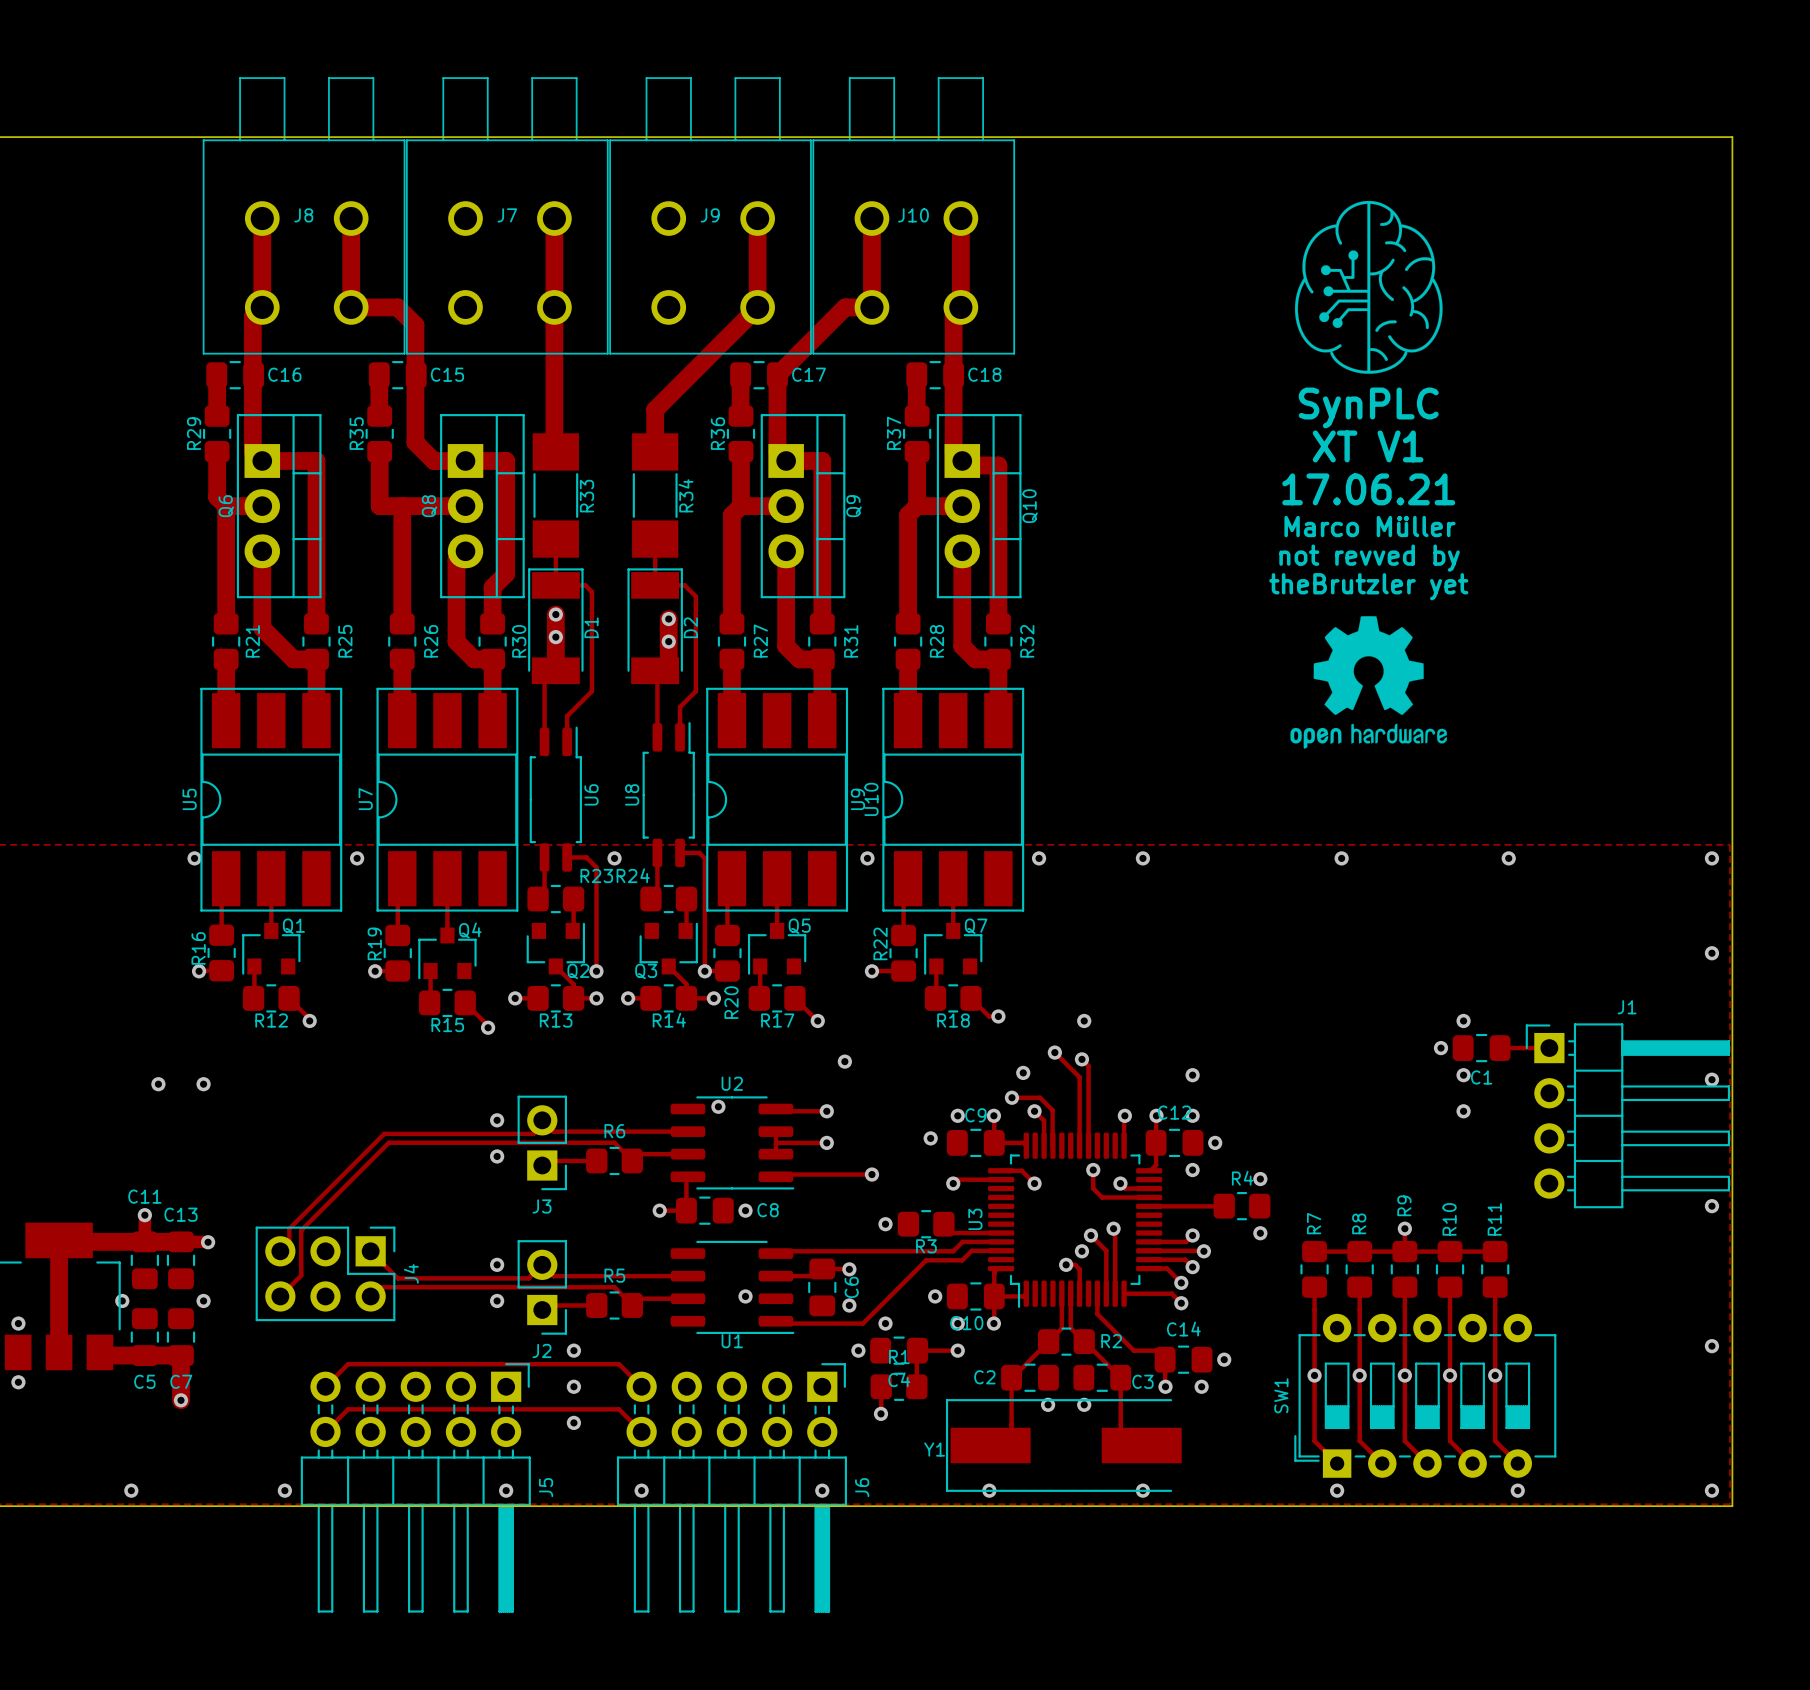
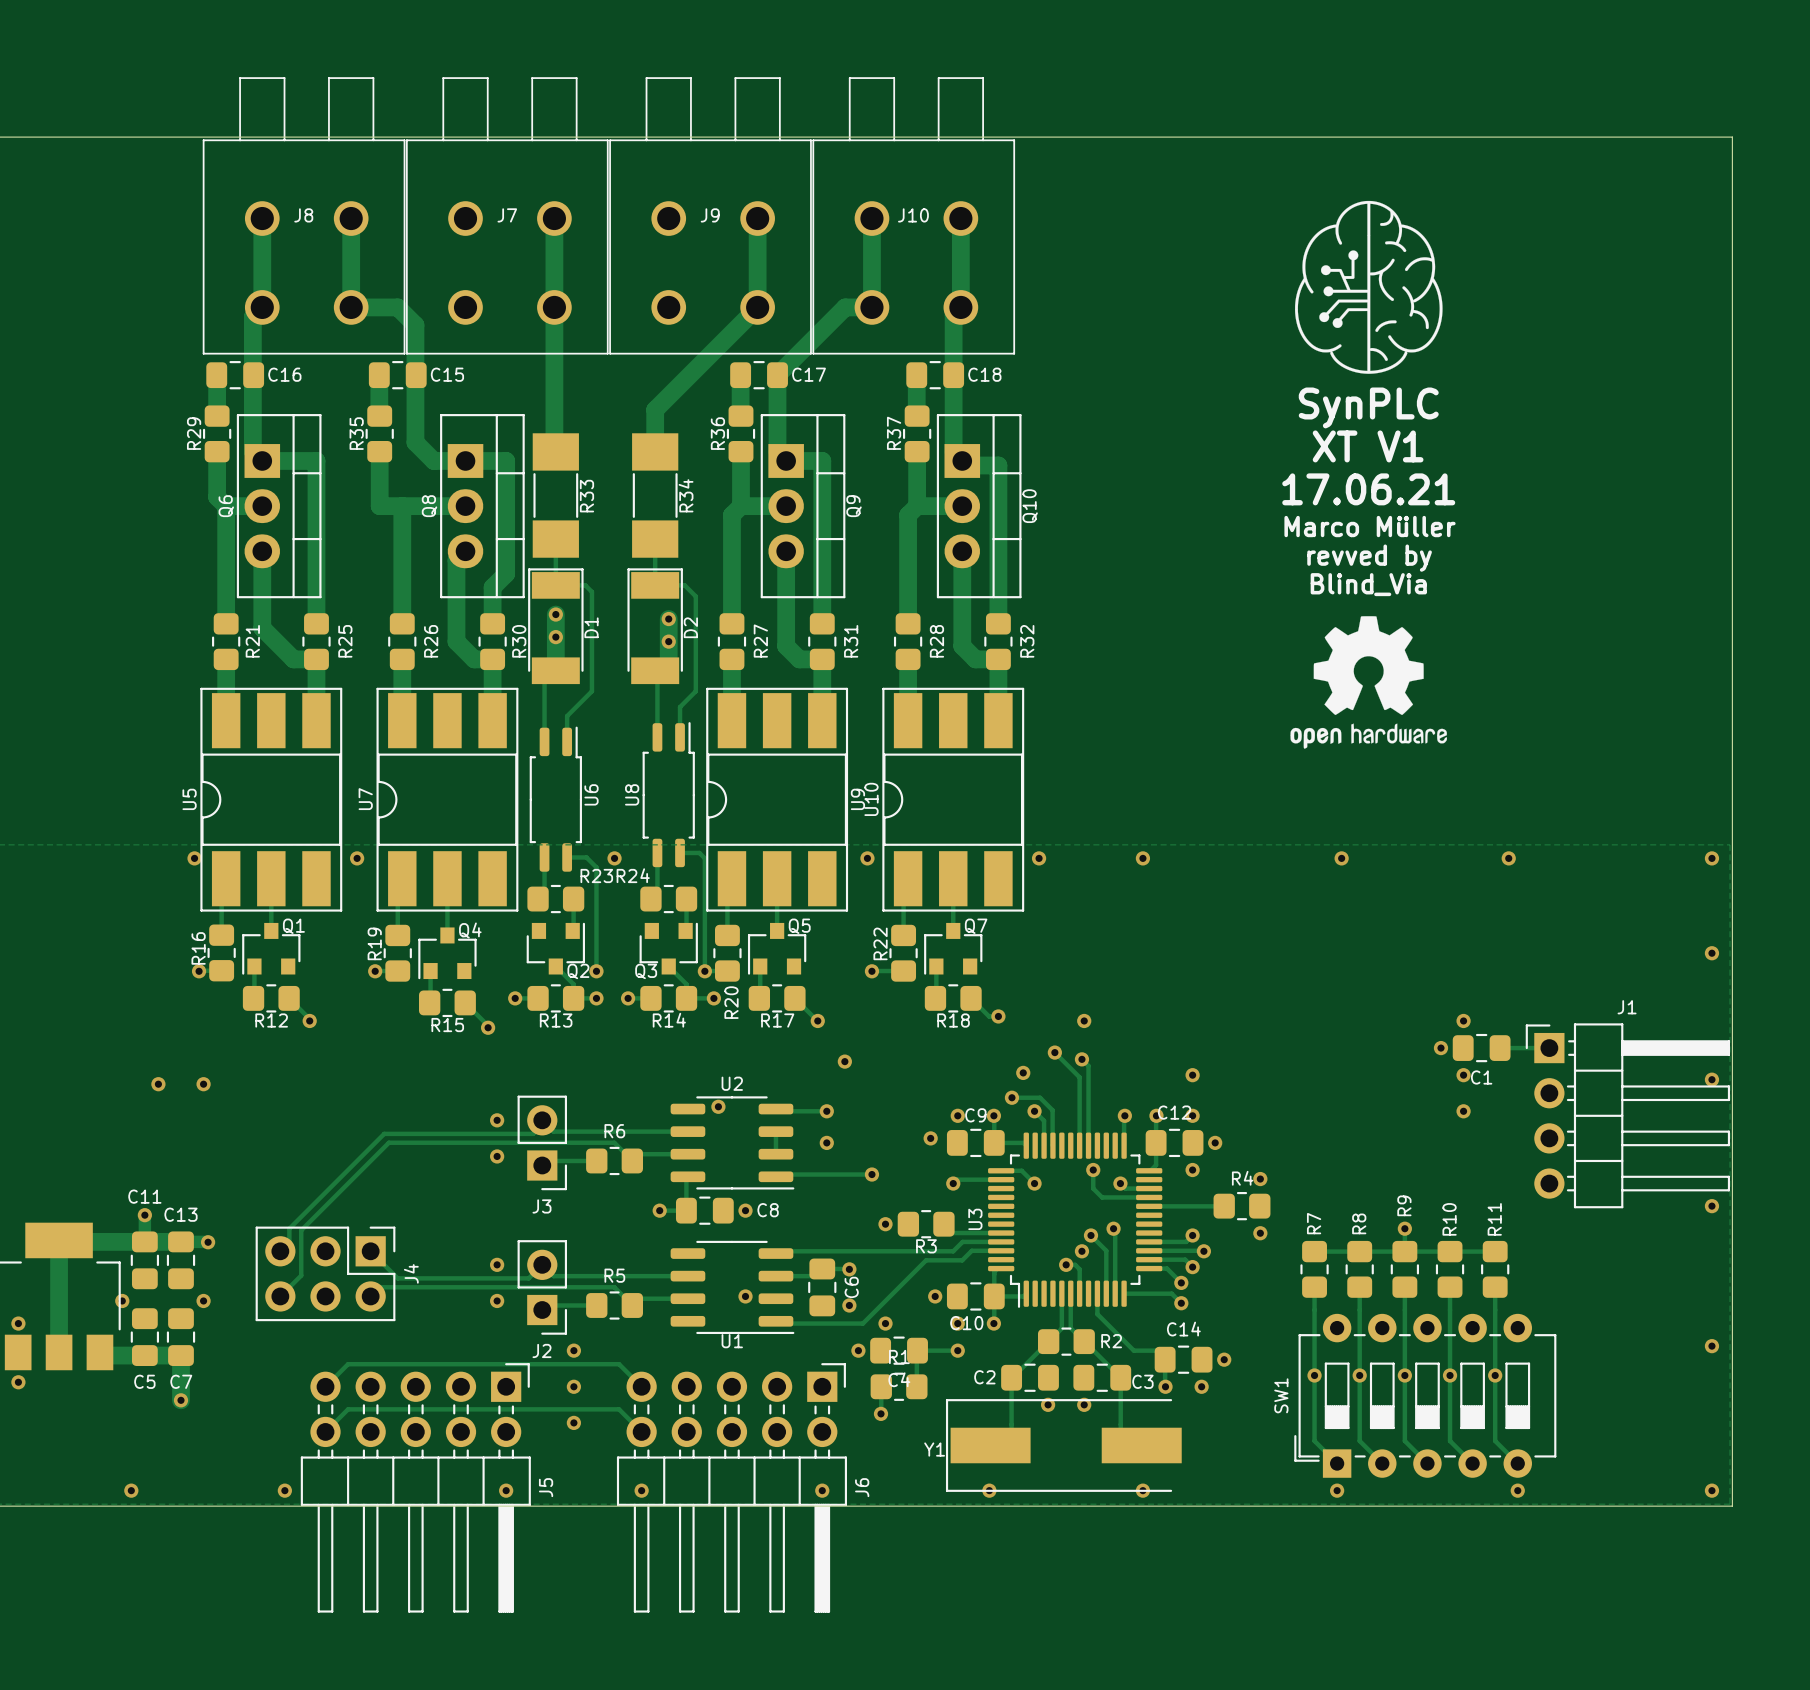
text: not revved by (1369, 558) -> revved by (1369, 558)
text: theBrutzler yet (1368, 586) -> Blind_Via (1368, 584)
track: (826, 1142) (775, 1144) -> none

